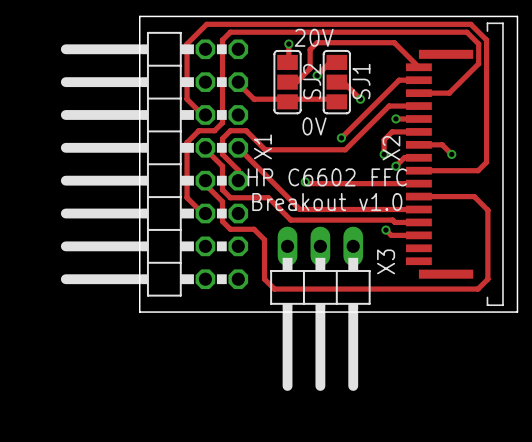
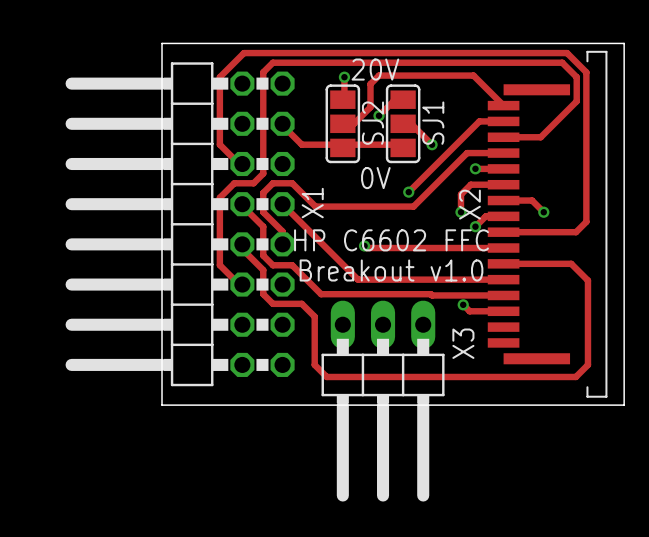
track: (246, 197) (268, 197) (290, 220) (392, 220) (395, 222) -> (292, 265) (321, 294) (474, 295)

